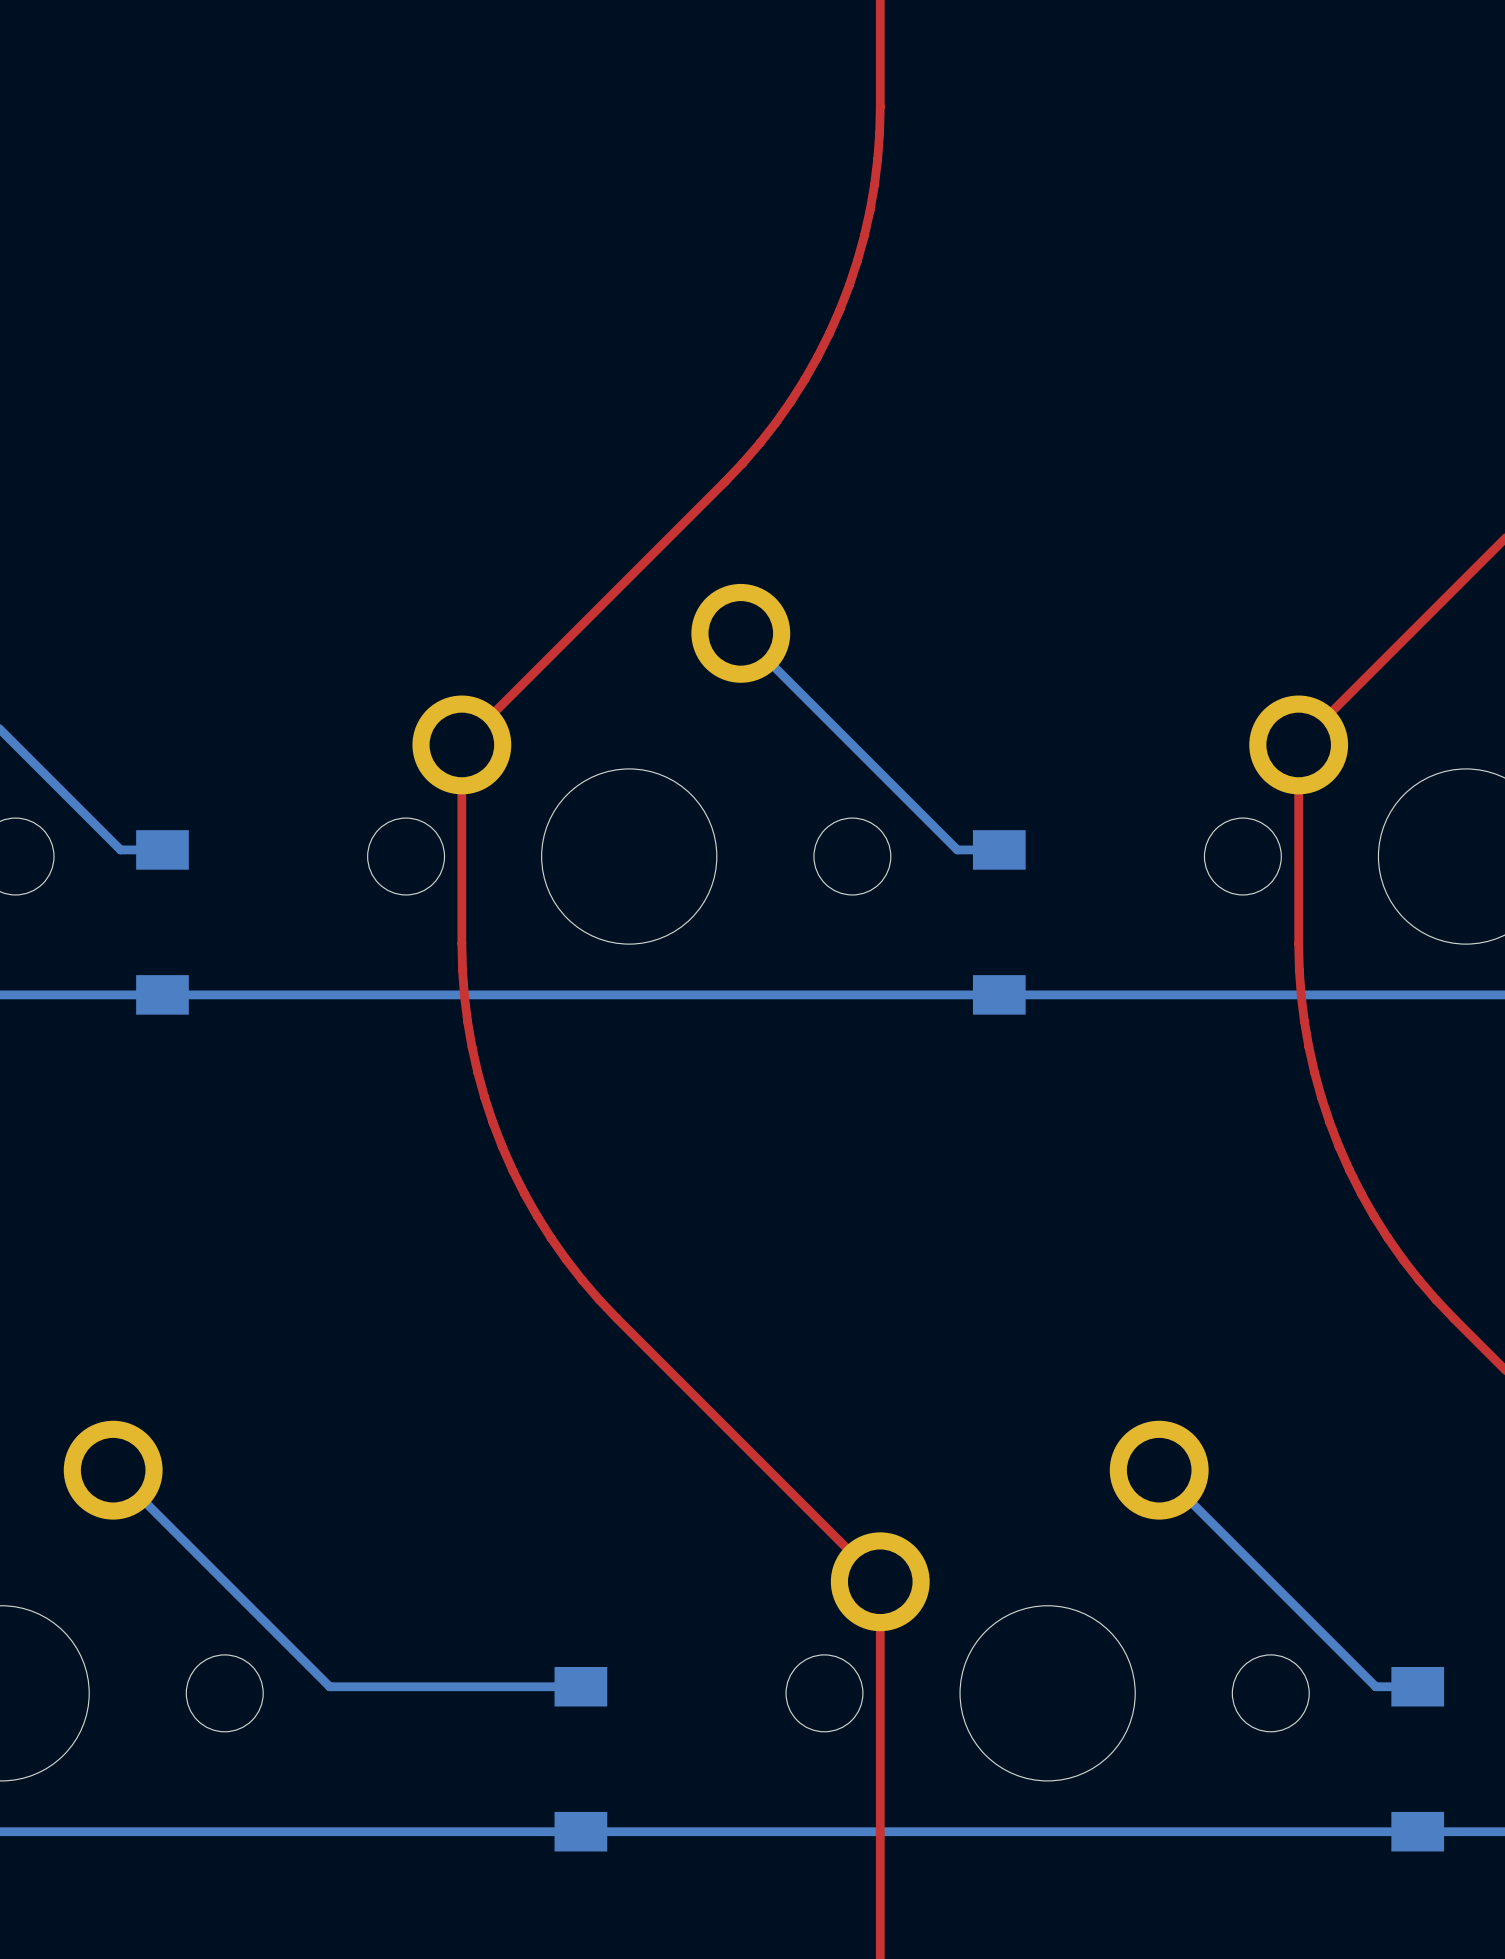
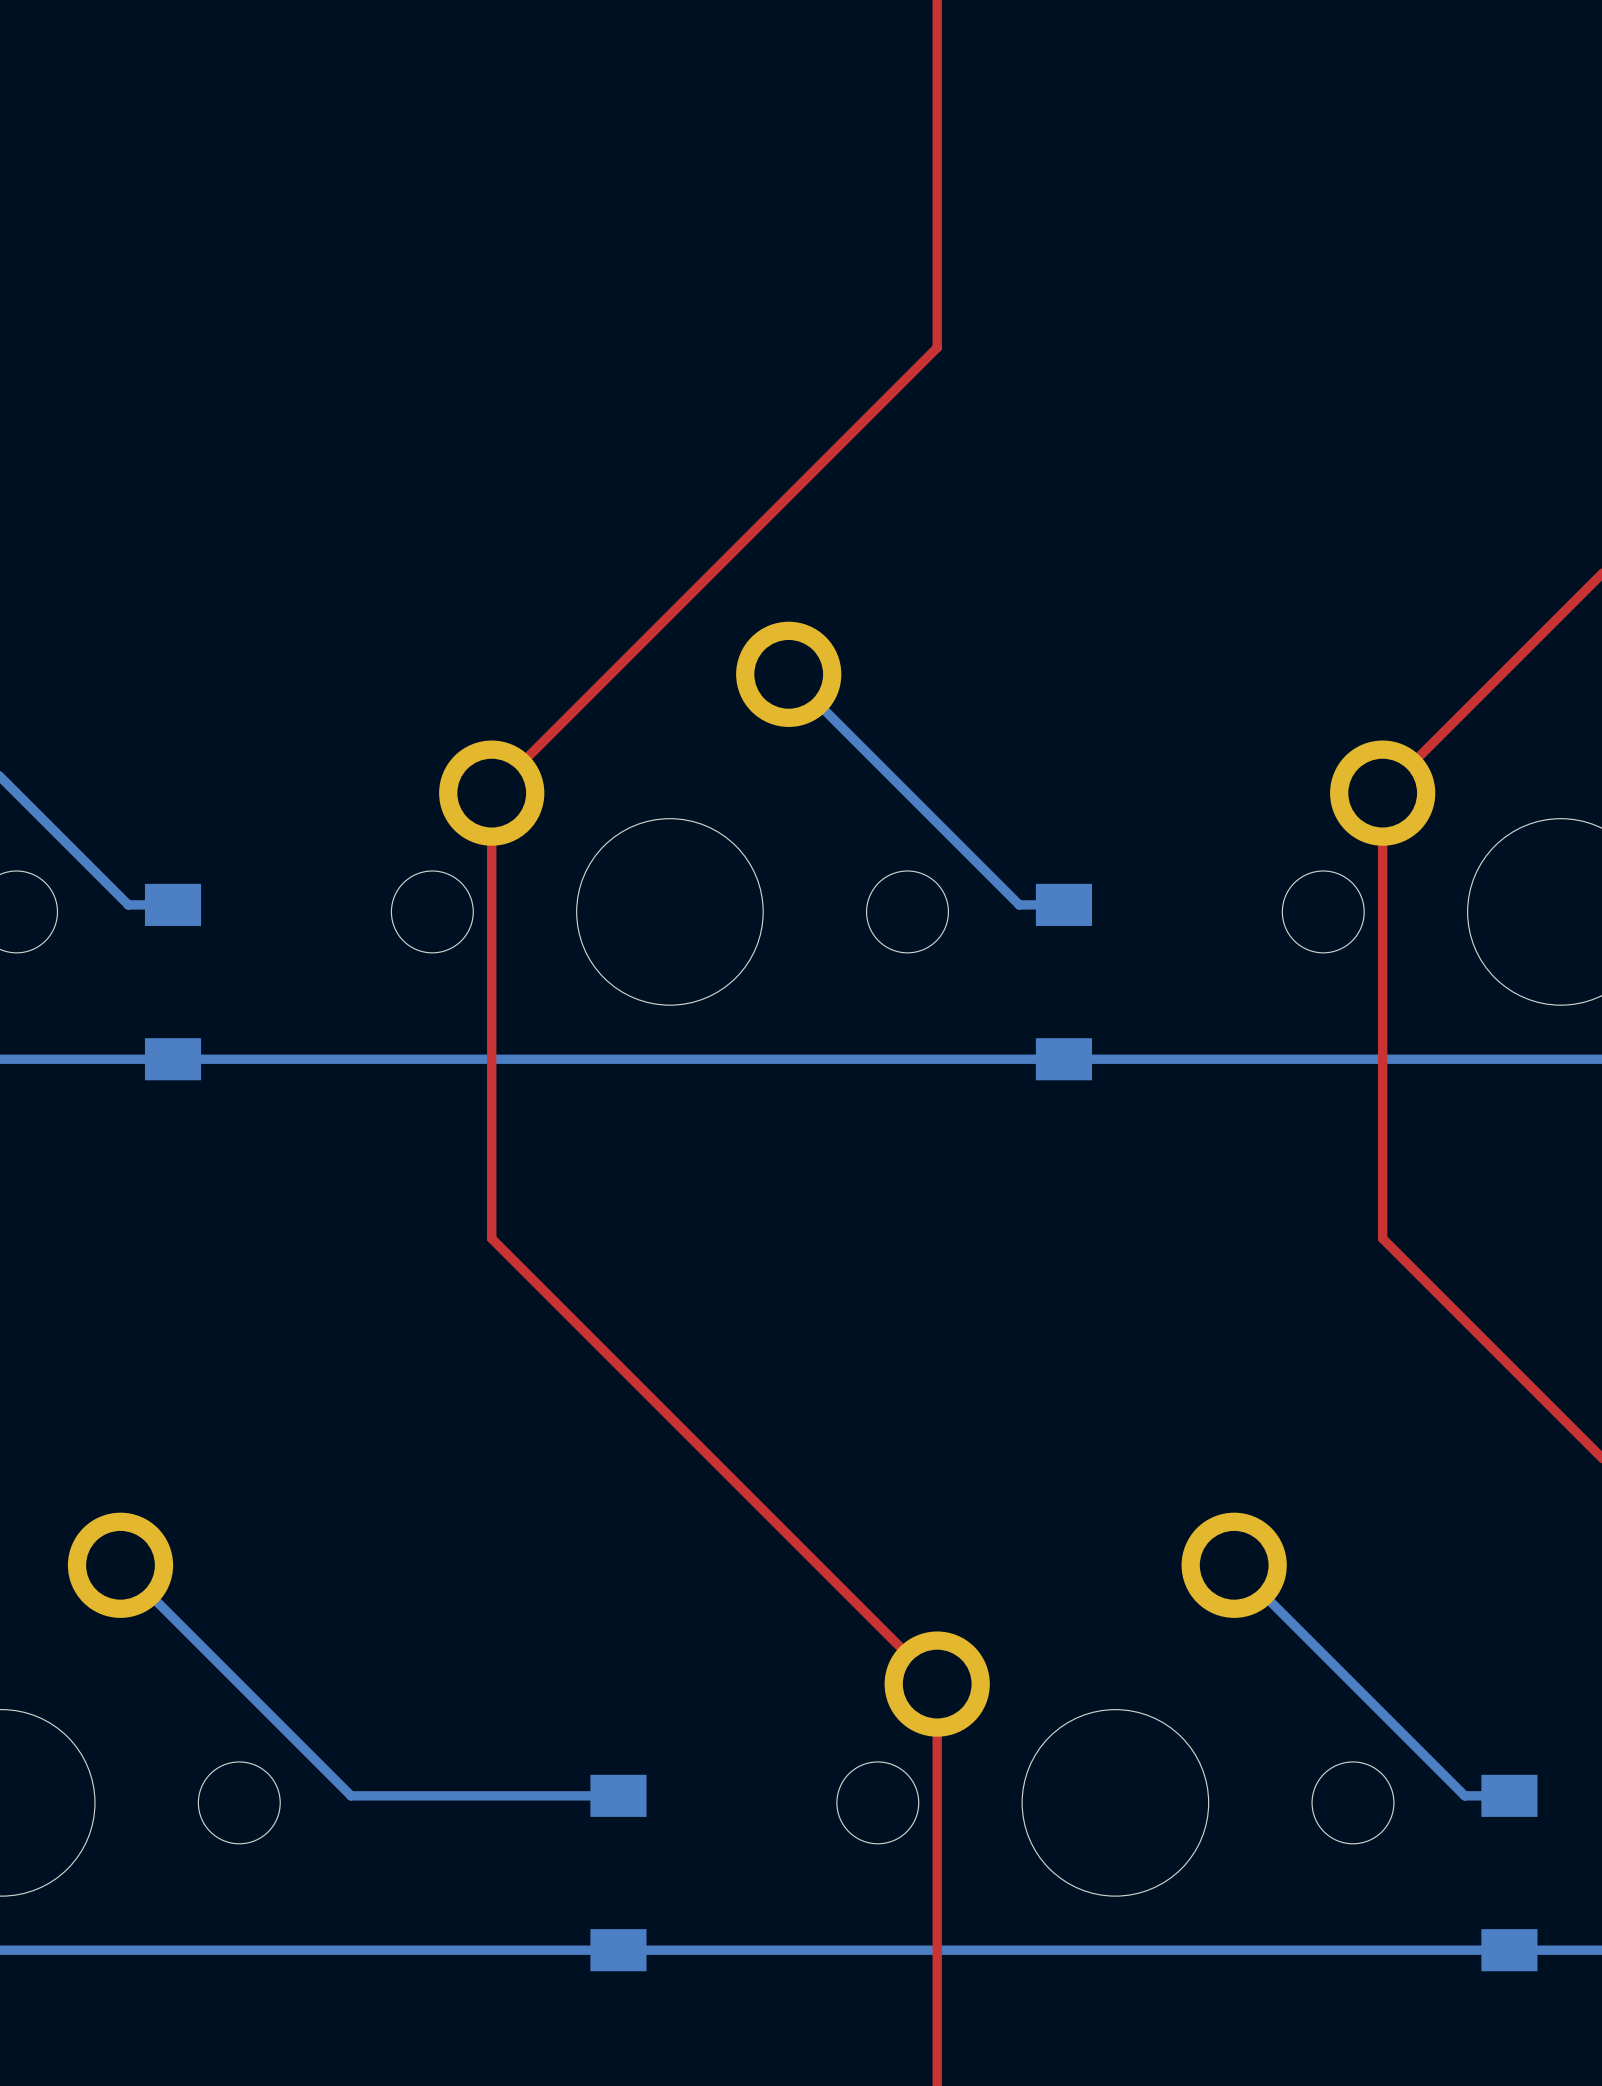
top track: (880, 106) (877, 158) (870, 210) (857, 260) (839, 309) (817, 356) (790, 401) (759, 443) (724, 481) -> (937, 113) (937, 347) (771, 513)
top track: (461, 943) (464, 995) (472, 1047) (484, 1097) (502, 1146) (524, 1193) (551, 1238) (582, 1280) (617, 1318) -> (491, 1004) (491, 1238) (657, 1403)
top track: (1298, 943) (1301, 995) (1308, 1047) (1321, 1097) (1339, 1146) (1361, 1193) (1388, 1238) (1419, 1280) (1453, 1318) -> (1382, 1004) (1382, 1238) (1548, 1403)

